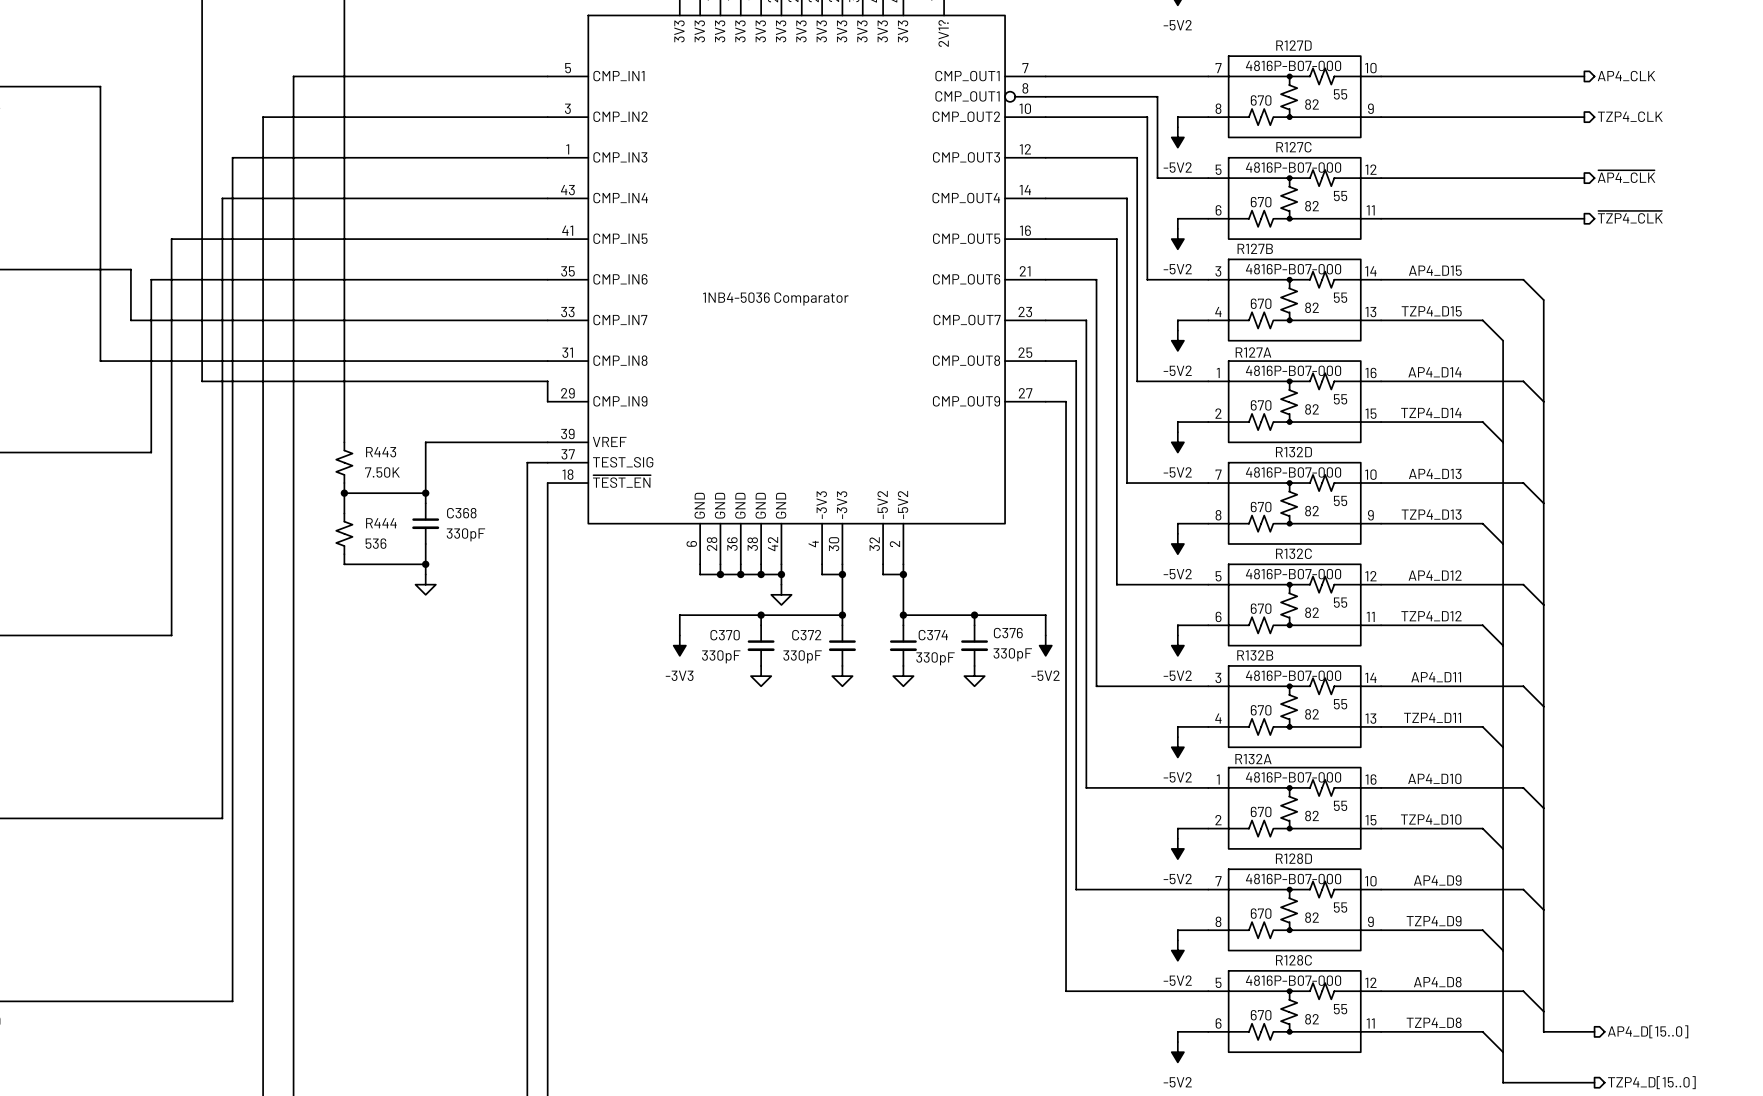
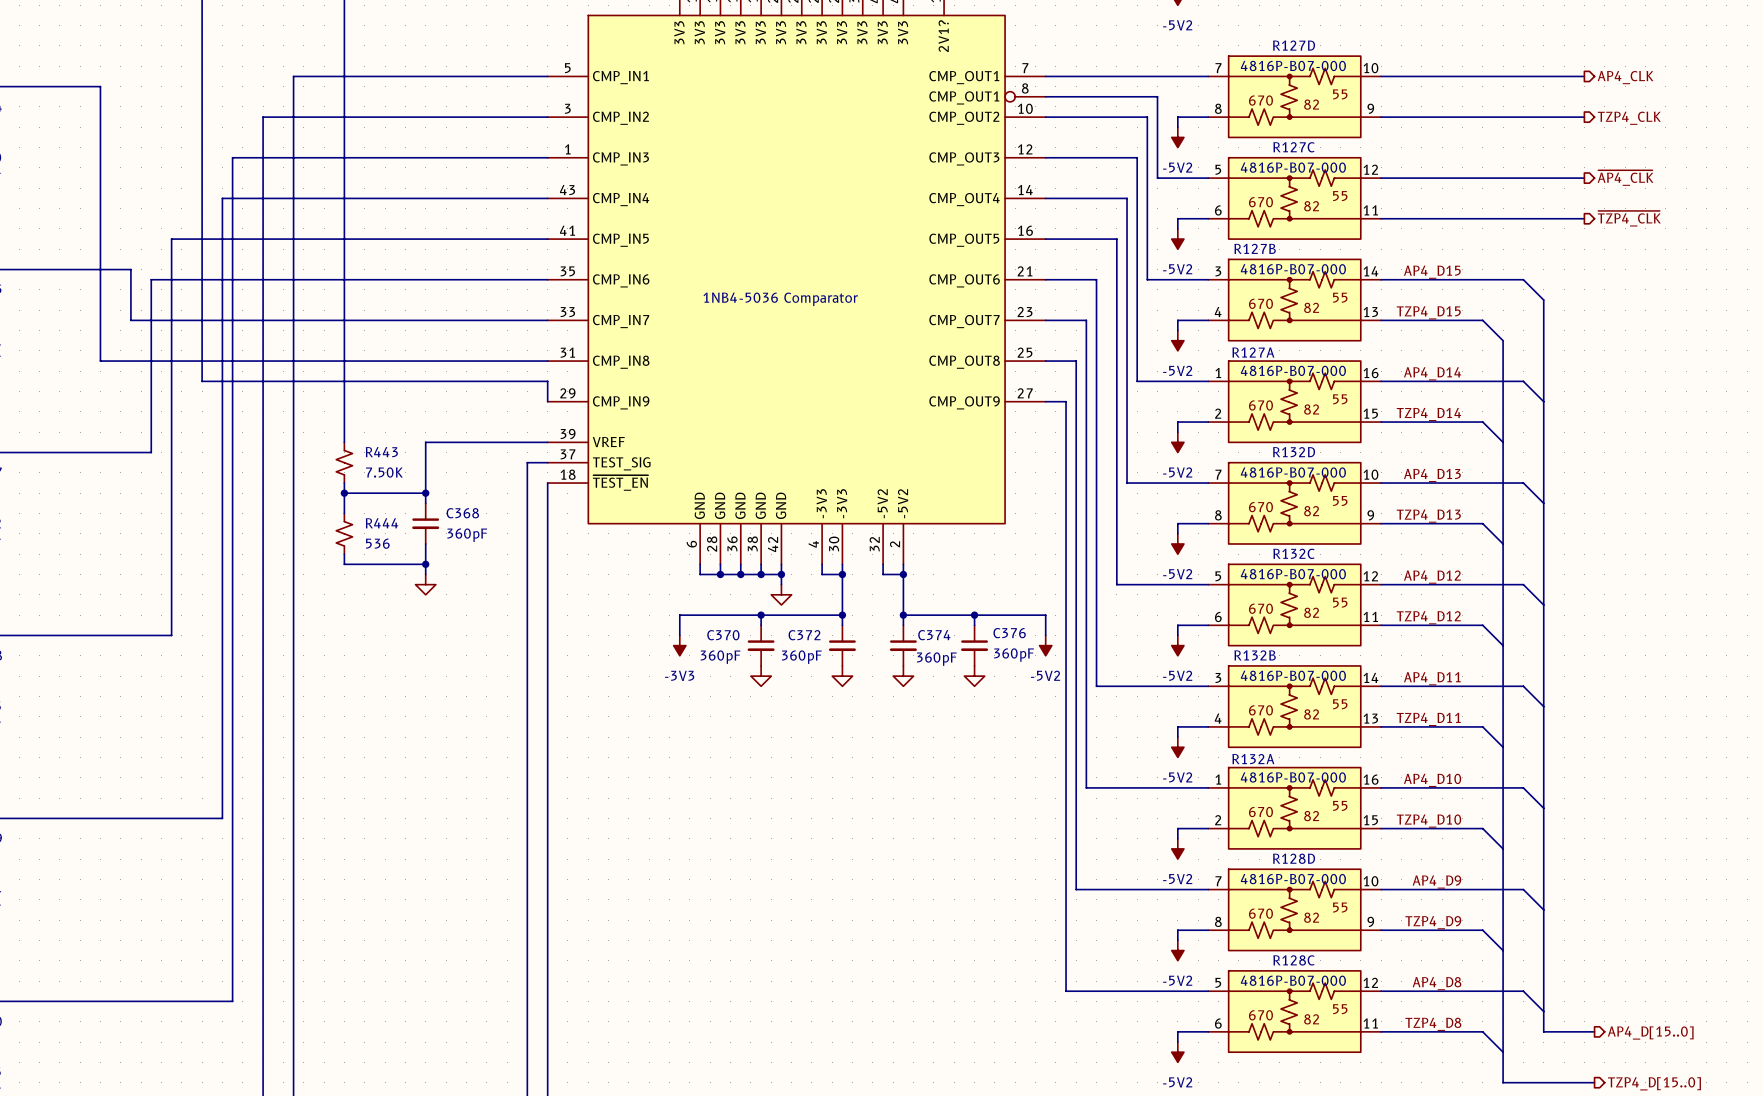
C368 value: 330pF (465, 534) -> 360pF (467, 535)
C376 value: 330pF (1012, 654) -> 360pF (1014, 655)
C370 value: 330pF (721, 656) -> 360pF (720, 657)
C372 value: 330pF (802, 656) -> 360pF (801, 657)
C374 value: 330pF (935, 658) -> 360pF (936, 659)

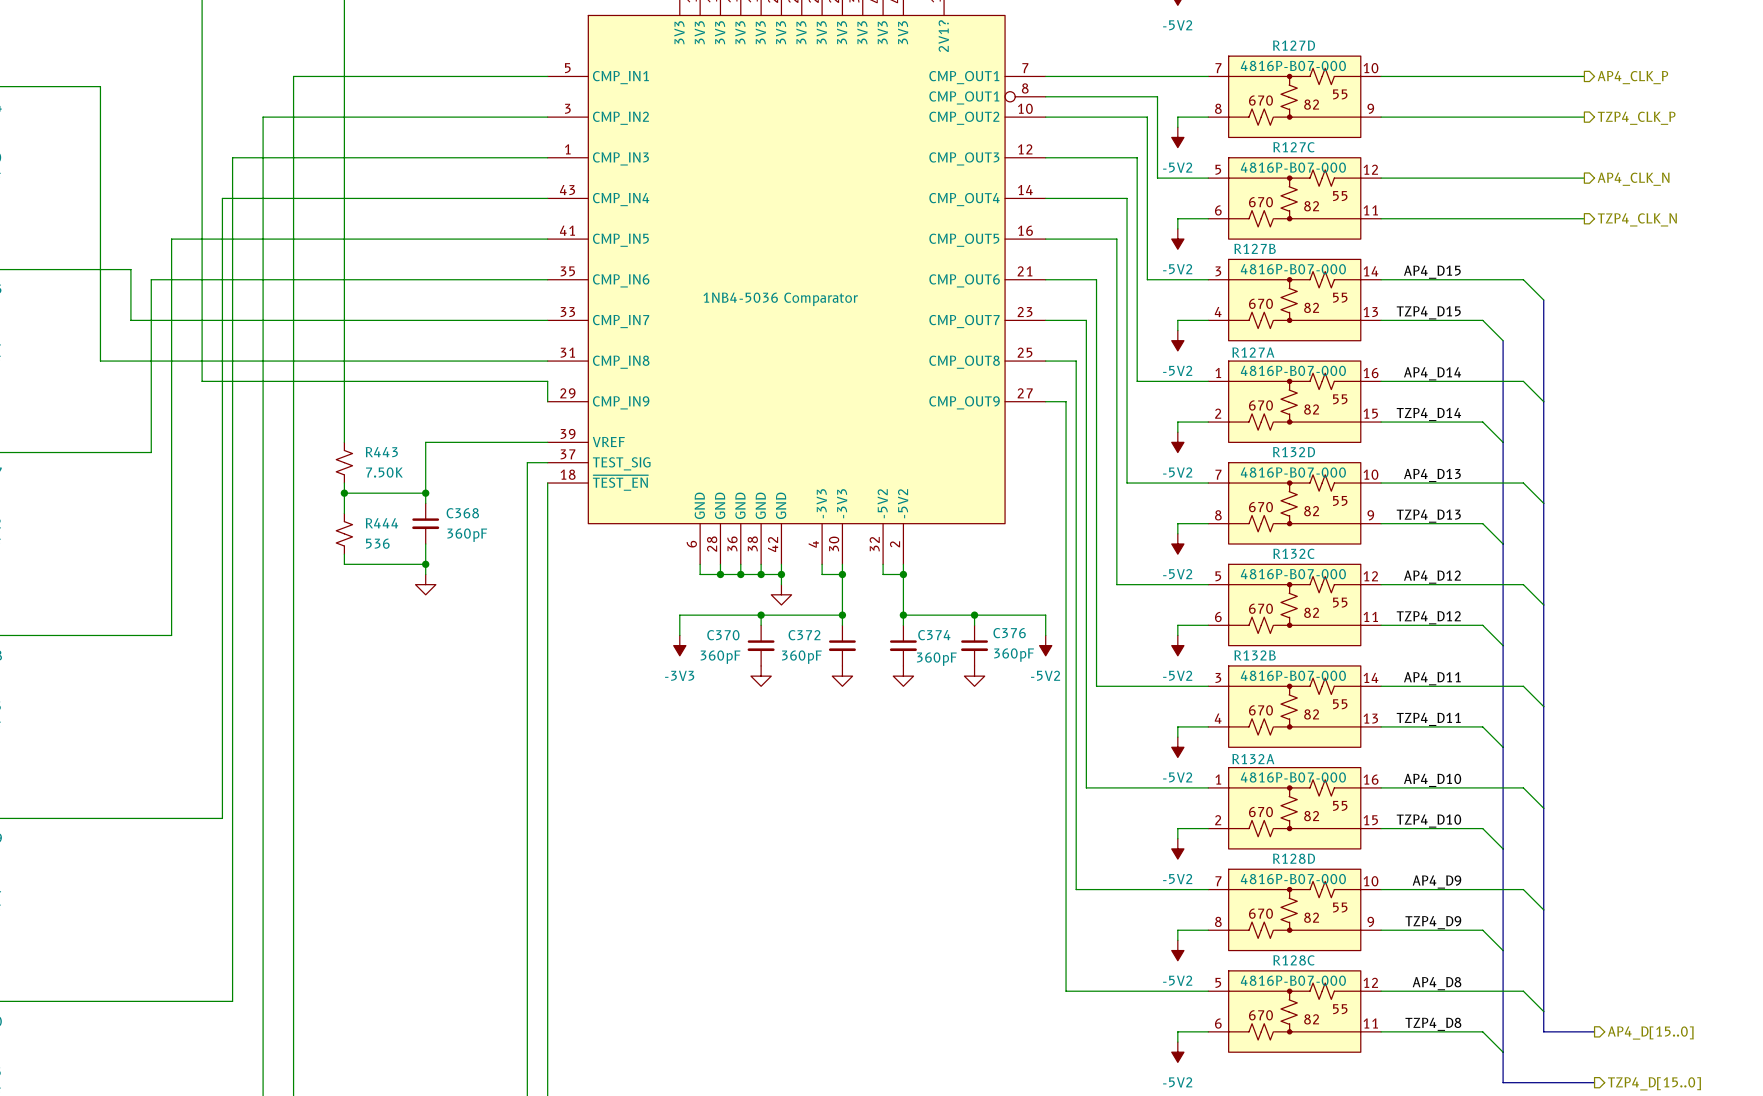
hierarchical label: AP4_CLK (1625, 77) -> AP4_CLK_P (1632, 77)
hierarchical label: TZP4_CLK (1629, 118) -> TZP4_CLK_P (1636, 118)
hierarchical label: ~{AP4_CLK} (1625, 178) -> AP4_CLK_N (1633, 179)
hierarchical label: ~{TZP4_CLK} (1629, 218) -> TZP4_CLK_N (1637, 219)

